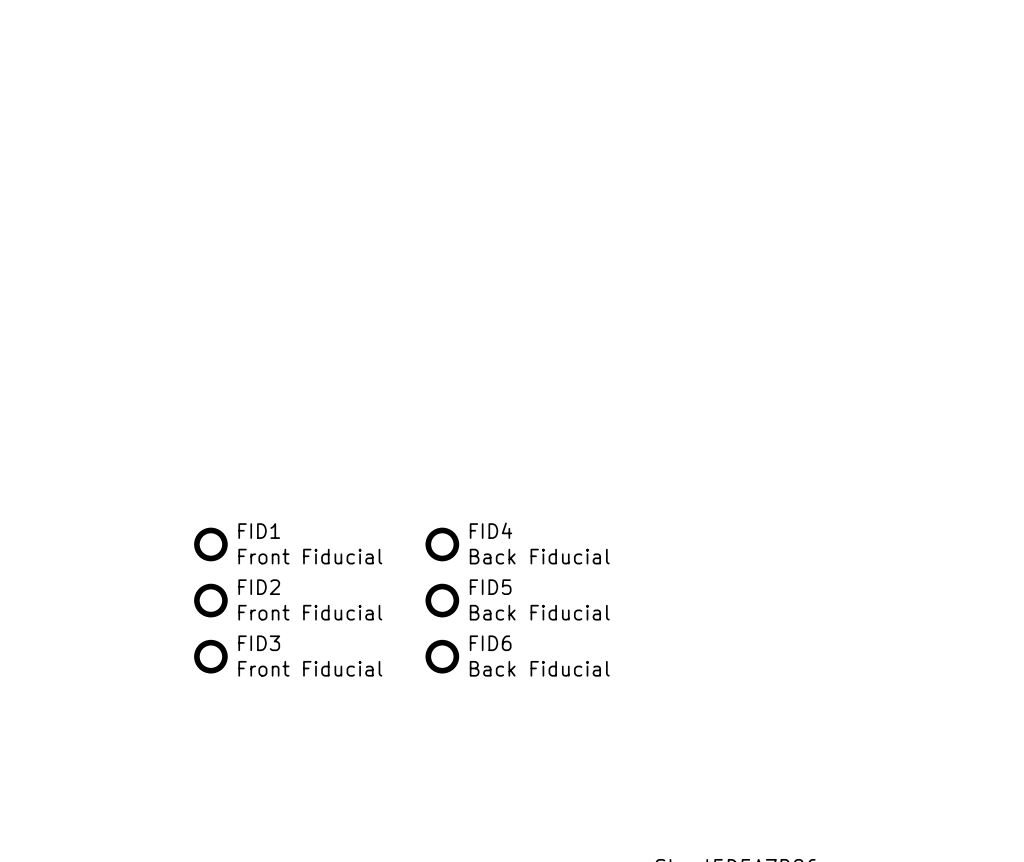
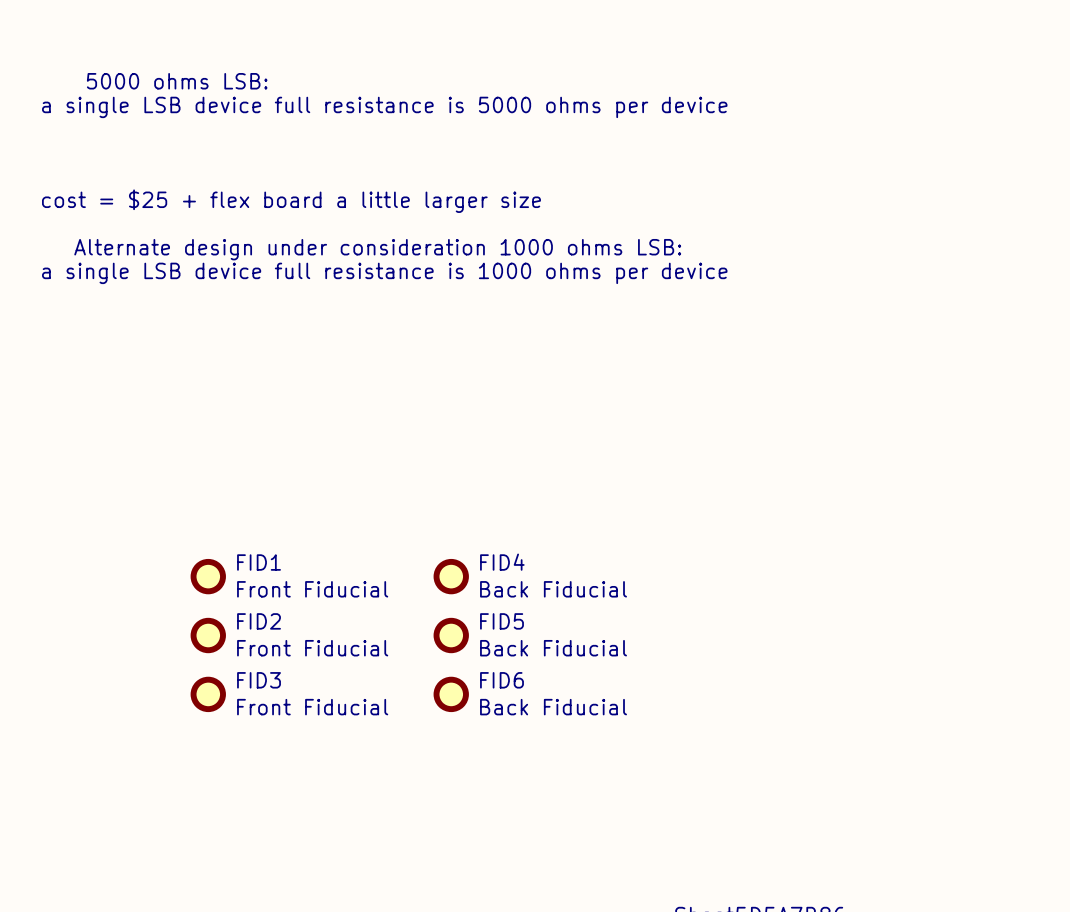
text: none -> 5000 ohms LSB: (177, 81)
text: none -> a single LSB device full resistance is 5000 ohms per device (384, 107)
text: none -> cost = $25 + flex board a little larger size (291, 201)
text: none -> Alternate design under consideration 1000 ohms LSB: (377, 249)
text: none -> a single LSB device full resistance is 1000 ohms per device (384, 273)

